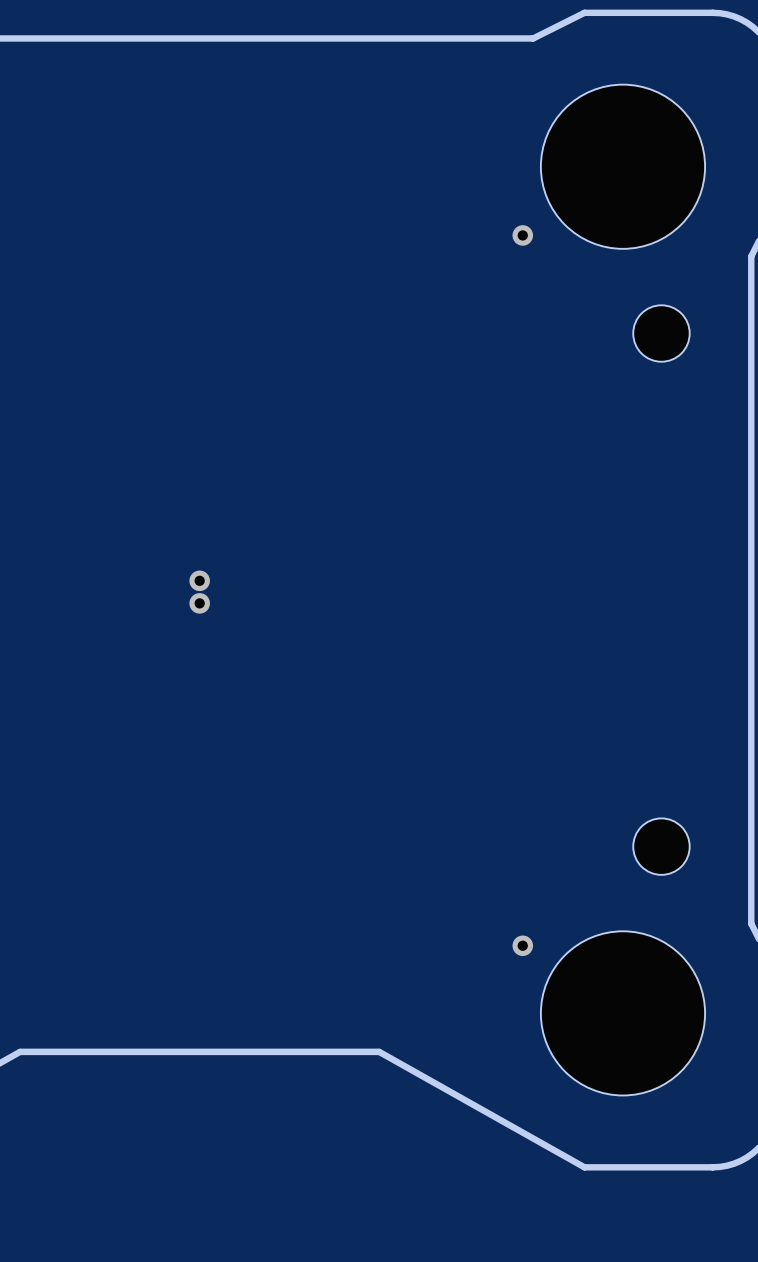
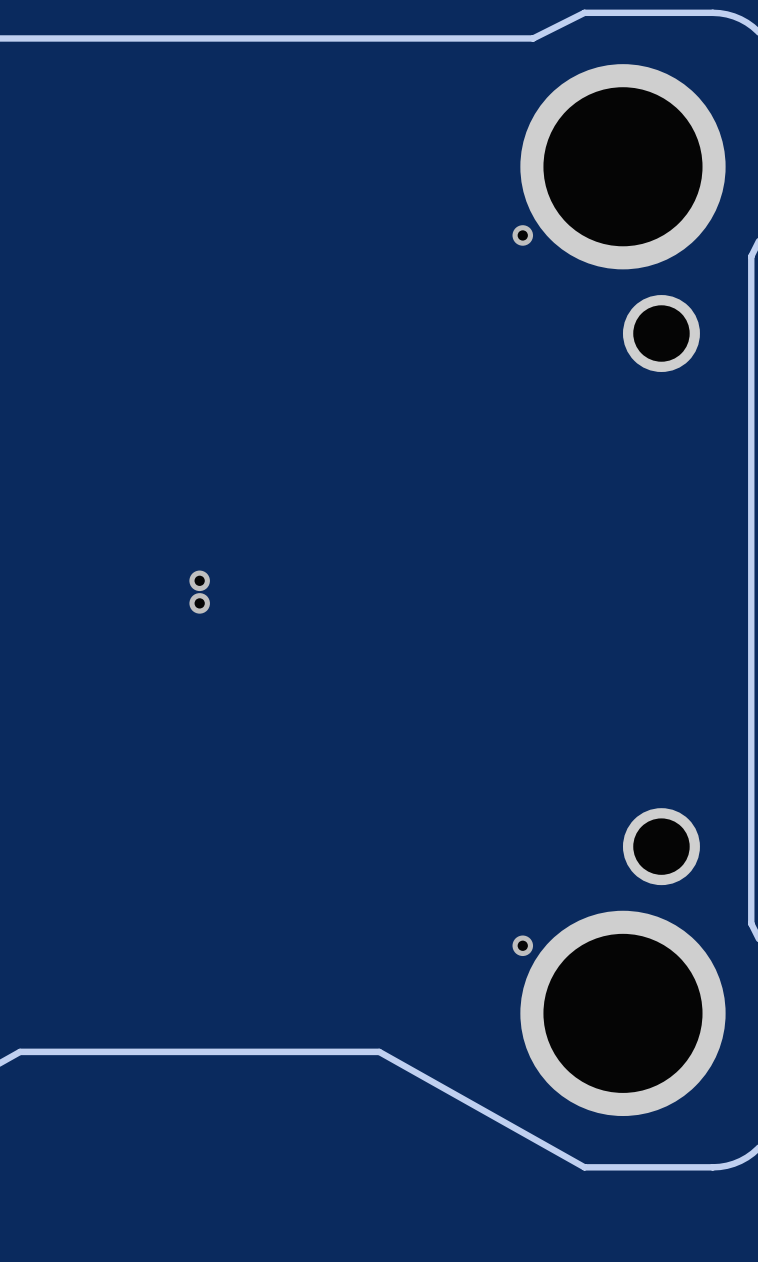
part footprint: [540, 84, 706, 249] -> [520, 64, 726, 270]
part footprint: [633, 305, 690, 362] -> [622, 295, 700, 372]
part footprint: [633, 818, 690, 875] -> [622, 808, 700, 886]
part footprint: [540, 931, 706, 1096] -> [520, 910, 726, 1117]

